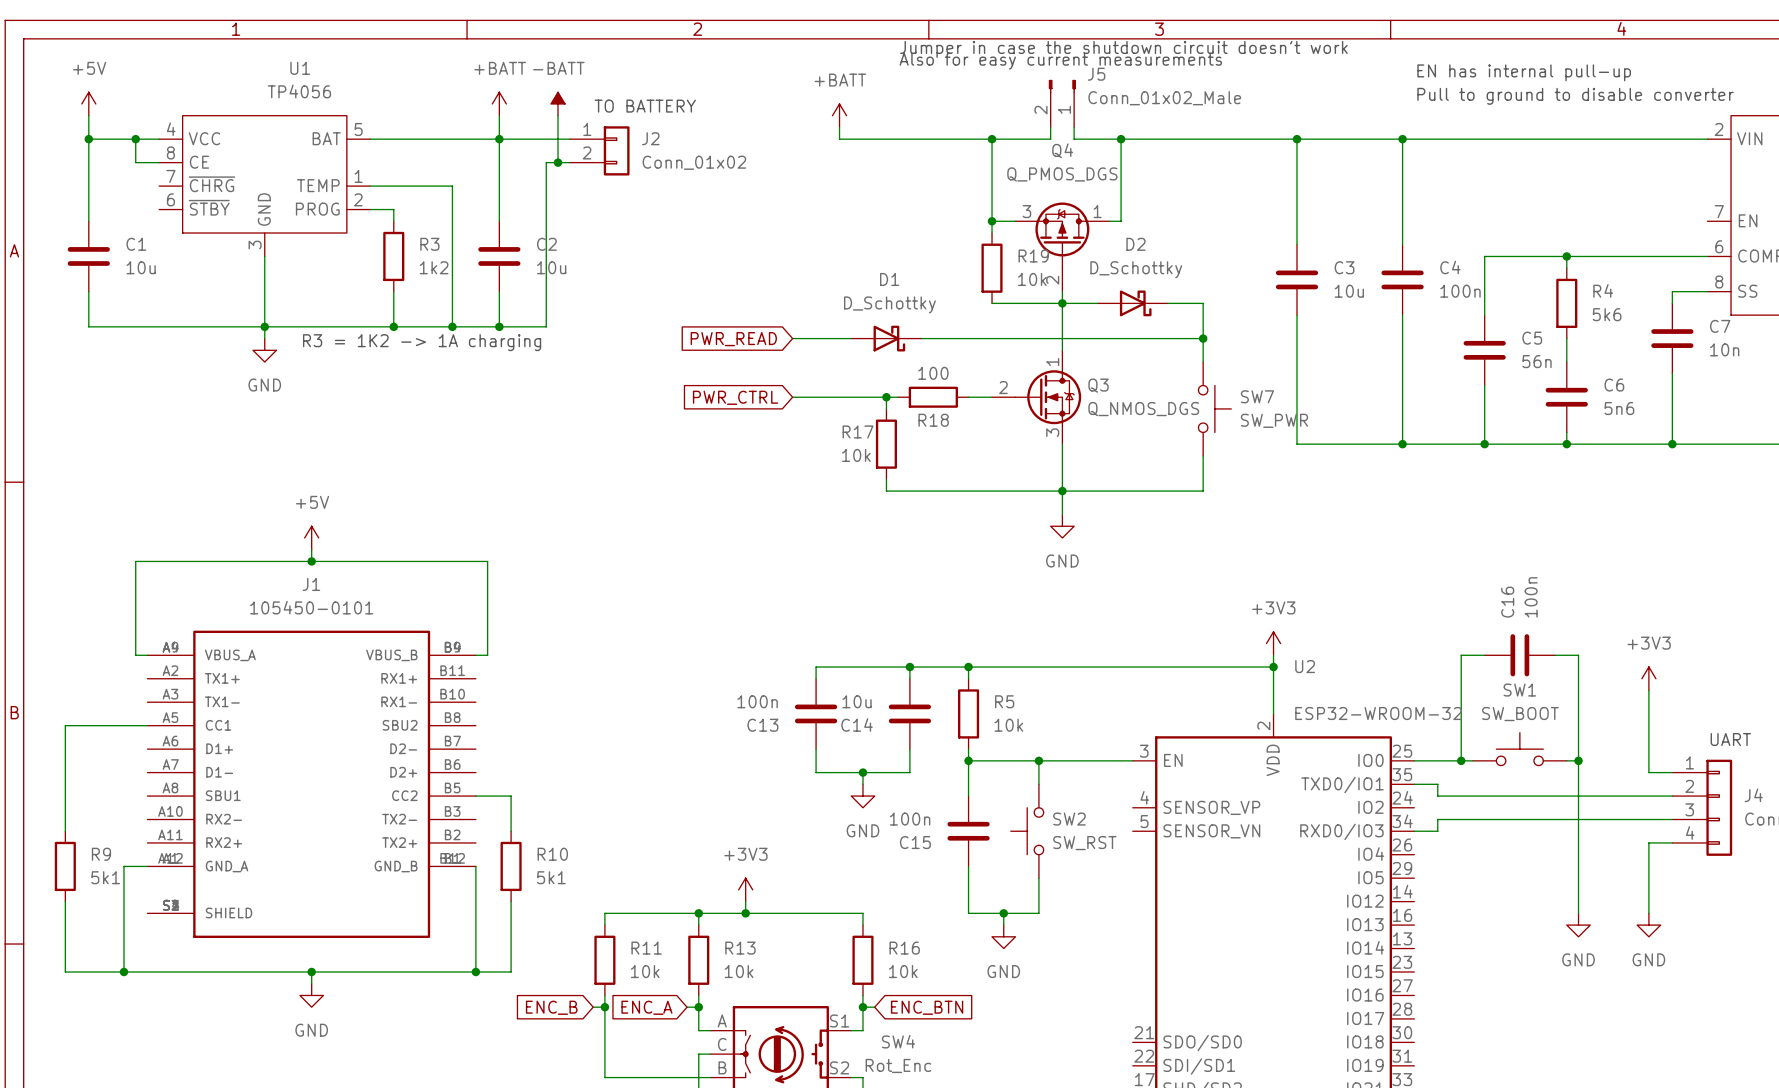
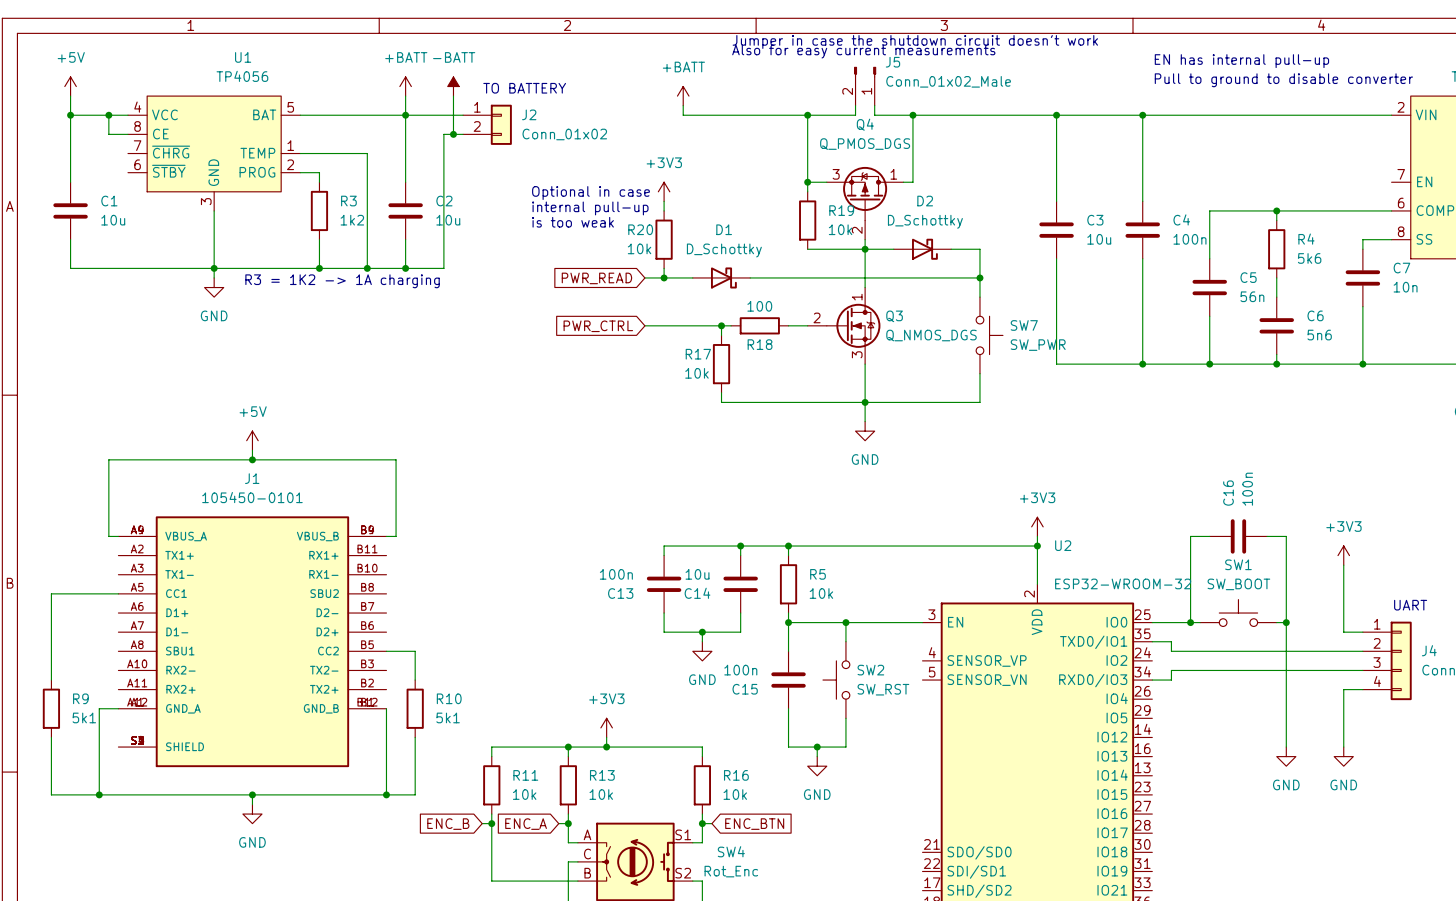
power symbol: none -> +3V3 (664, 191)
text: none -> Optional in case (590, 193)
wire: none -> (664, 201) (664, 210)
text: none -> internal pull-up (590, 208)
text: none -> is too weak (572, 222)
R20: none -> 10k (664, 239)
wire: none -> (664, 268) (664, 277)
junction: none -> (664, 277)

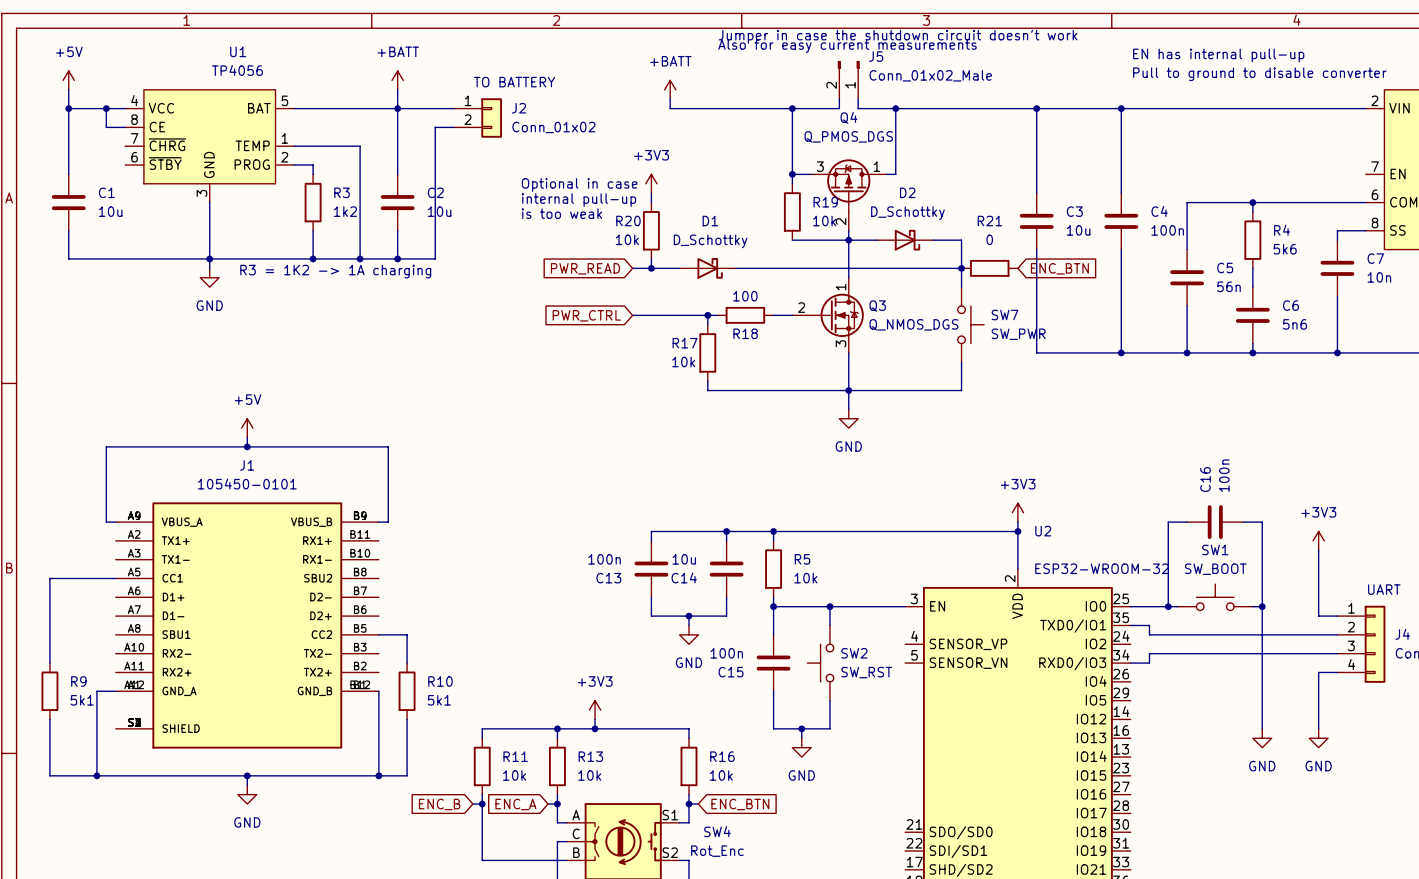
power symbol: -BATT (453, 86) -> none
wire: (453, 96) (453, 134) -> none
junction: (453, 134) -> none
R21: none -> 0 (989, 268)
global label: none -> ENC_BTN (1059, 268)

